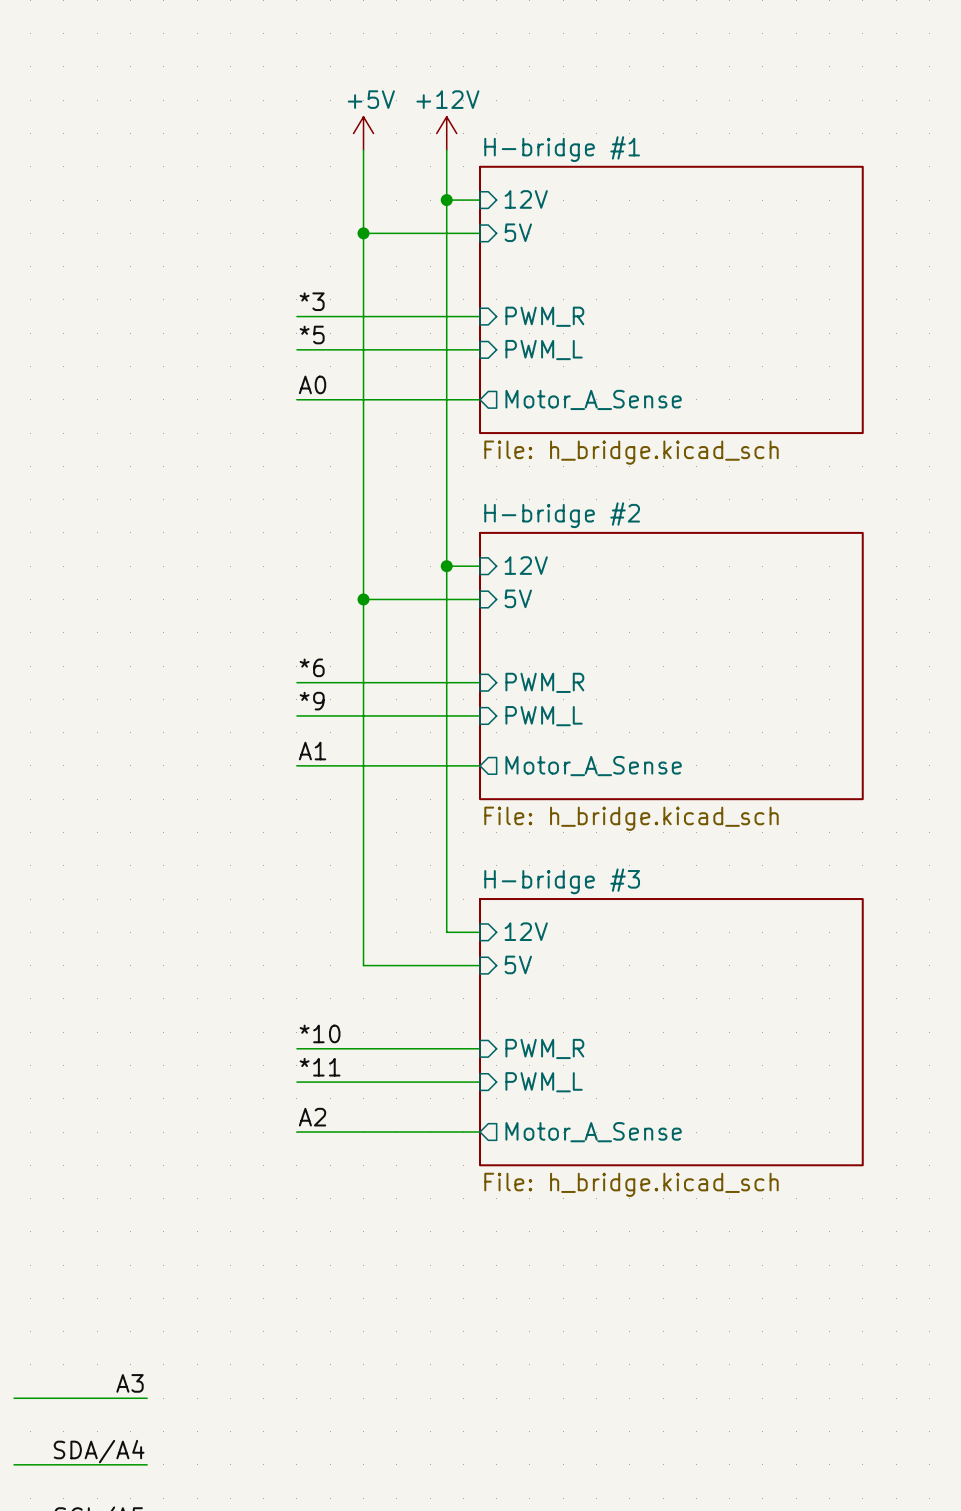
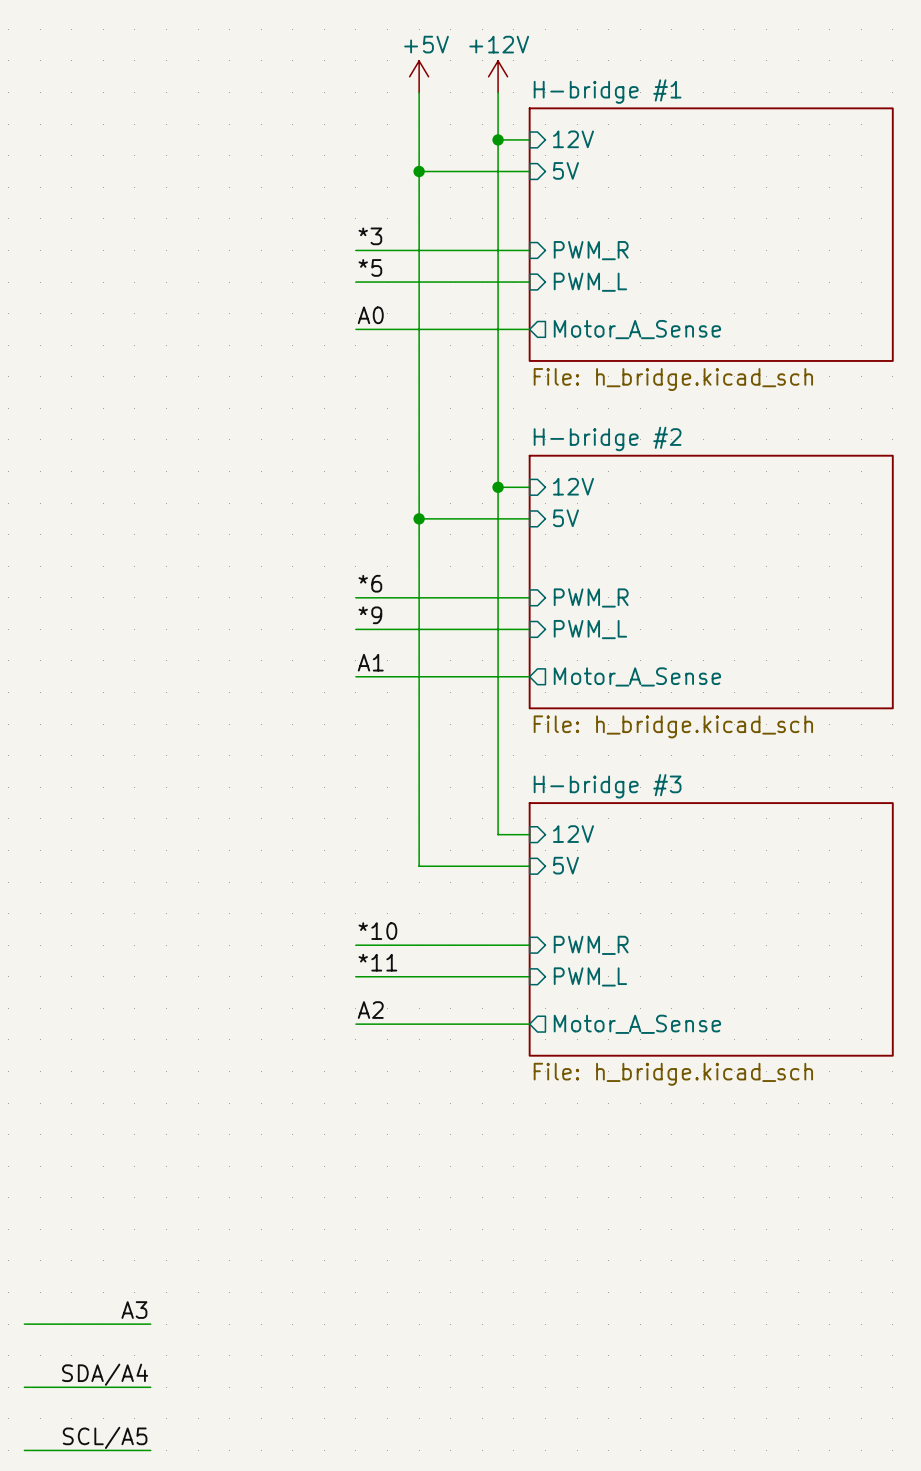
power symbol position: +5V (363, 133) -> +5V (419, 76)
power symbol position: +12V (446, 133) -> +12V (498, 76)
wire: (363, 150) (363, 965) (480, 965) -> (419, 92) (419, 866) (529, 866)
wire: (446, 150) (446, 932) (480, 932) -> (498, 92) (498, 834) (529, 834)
junction: none -> (498, 139)
sheet pin position: 12V (526, 199) -> 12V (573, 139)
wire: (446, 200) (480, 200) -> (498, 139) (529, 139)
junction position: (446, 200) -> (419, 171)
sheet pin position: 5V (518, 232) -> 5V (565, 170)
wire: (363, 233) (480, 233) -> (419, 171) (529, 171)
junction: (363, 233) -> none
sheet H-bridge #1 position: (671, 299) -> (711, 234)
label position: *3 (312, 301) -> *3 (370, 236)
wire: (296, 316) (480, 316) -> (355, 250) (529, 250)
sheet pin position: PWM_R (544, 316) -> PWM_R (591, 250)
label position: *5 (312, 335) -> *5 (370, 267)
wire: (296, 349) (363, 349) -> (466, 329) (529, 329)
sheet pin position: PWM_L (544, 350) -> PWM_L (590, 282)
label position: A0 (312, 384) -> A0 (370, 315)
wire: (296, 399) (480, 399) -> (355, 282) (529, 282)
sheet pin position: Motor_A_Sense (593, 399) -> Motor_A_Sense (637, 329)
junction: none -> (498, 487)
sheet pin position: 12V (526, 565) -> 12V (573, 486)
wire: (446, 566) (480, 566) -> (498, 487) (529, 487)
junction position: (446, 566) -> (419, 518)
sheet pin position: 5V (518, 598) -> 5V (565, 518)
wire: (363, 599) (480, 599) -> (419, 518) (529, 518)
junction: (363, 599) -> none
sheet H-bridge #2 position: (671, 666) -> (711, 582)
label position: *6 (312, 667) -> *6 (370, 583)
wire: (296, 682) (480, 682) -> (355, 597) (529, 597)
sheet pin position: PWM_R (544, 682) -> PWM_R (591, 597)
label position: *9 (312, 701) -> *9 (370, 615)
wire: (296, 715) (363, 715) -> (466, 676) (529, 676)
sheet pin position: PWM_L (544, 716) -> PWM_L (590, 629)
label position: A1 (312, 751) -> A1 (370, 662)
wire: (296, 765) (480, 765) -> (355, 629) (529, 629)
sheet pin position: Motor_A_Sense (593, 766) -> Motor_A_Sense (637, 676)
sheet pin position: 12V (526, 931) -> 12V (573, 834)
sheet pin position: 5V (518, 964) -> 5V (565, 865)
sheet H-bridge #3 position: (671, 1032) -> (711, 929)
label position: *10 (320, 1033) -> *10 (377, 931)
wire: (296, 1048) (480, 1048) -> (355, 945) (529, 945)
sheet pin position: PWM_R (544, 1048) -> PWM_R (591, 945)
label position: *11 (320, 1067) -> *11 (377, 962)
wire: (296, 1082) (363, 1082) -> (466, 1024) (529, 1024)
sheet pin position: PWM_L (544, 1082) -> PWM_L (590, 976)
label position: A2 (312, 1117) -> A2 (370, 1010)
wire: (296, 1132) (480, 1132) -> (355, 976) (529, 976)
sheet pin position: Motor_A_Sense (593, 1132) -> Motor_A_Sense (637, 1024)

